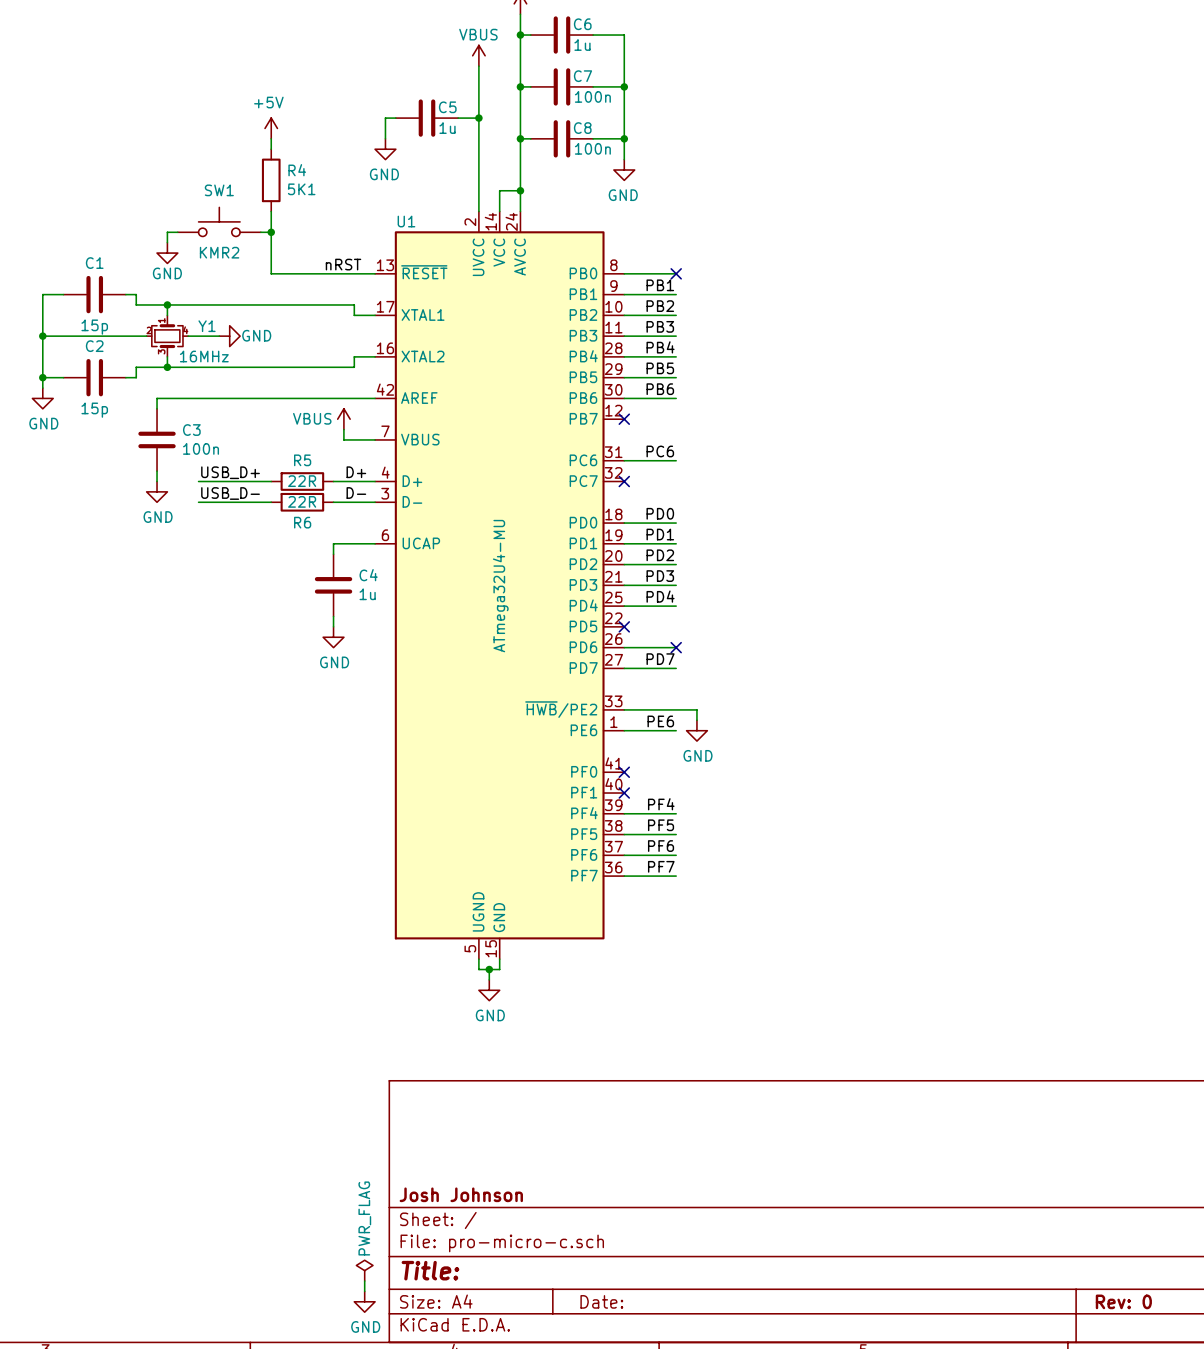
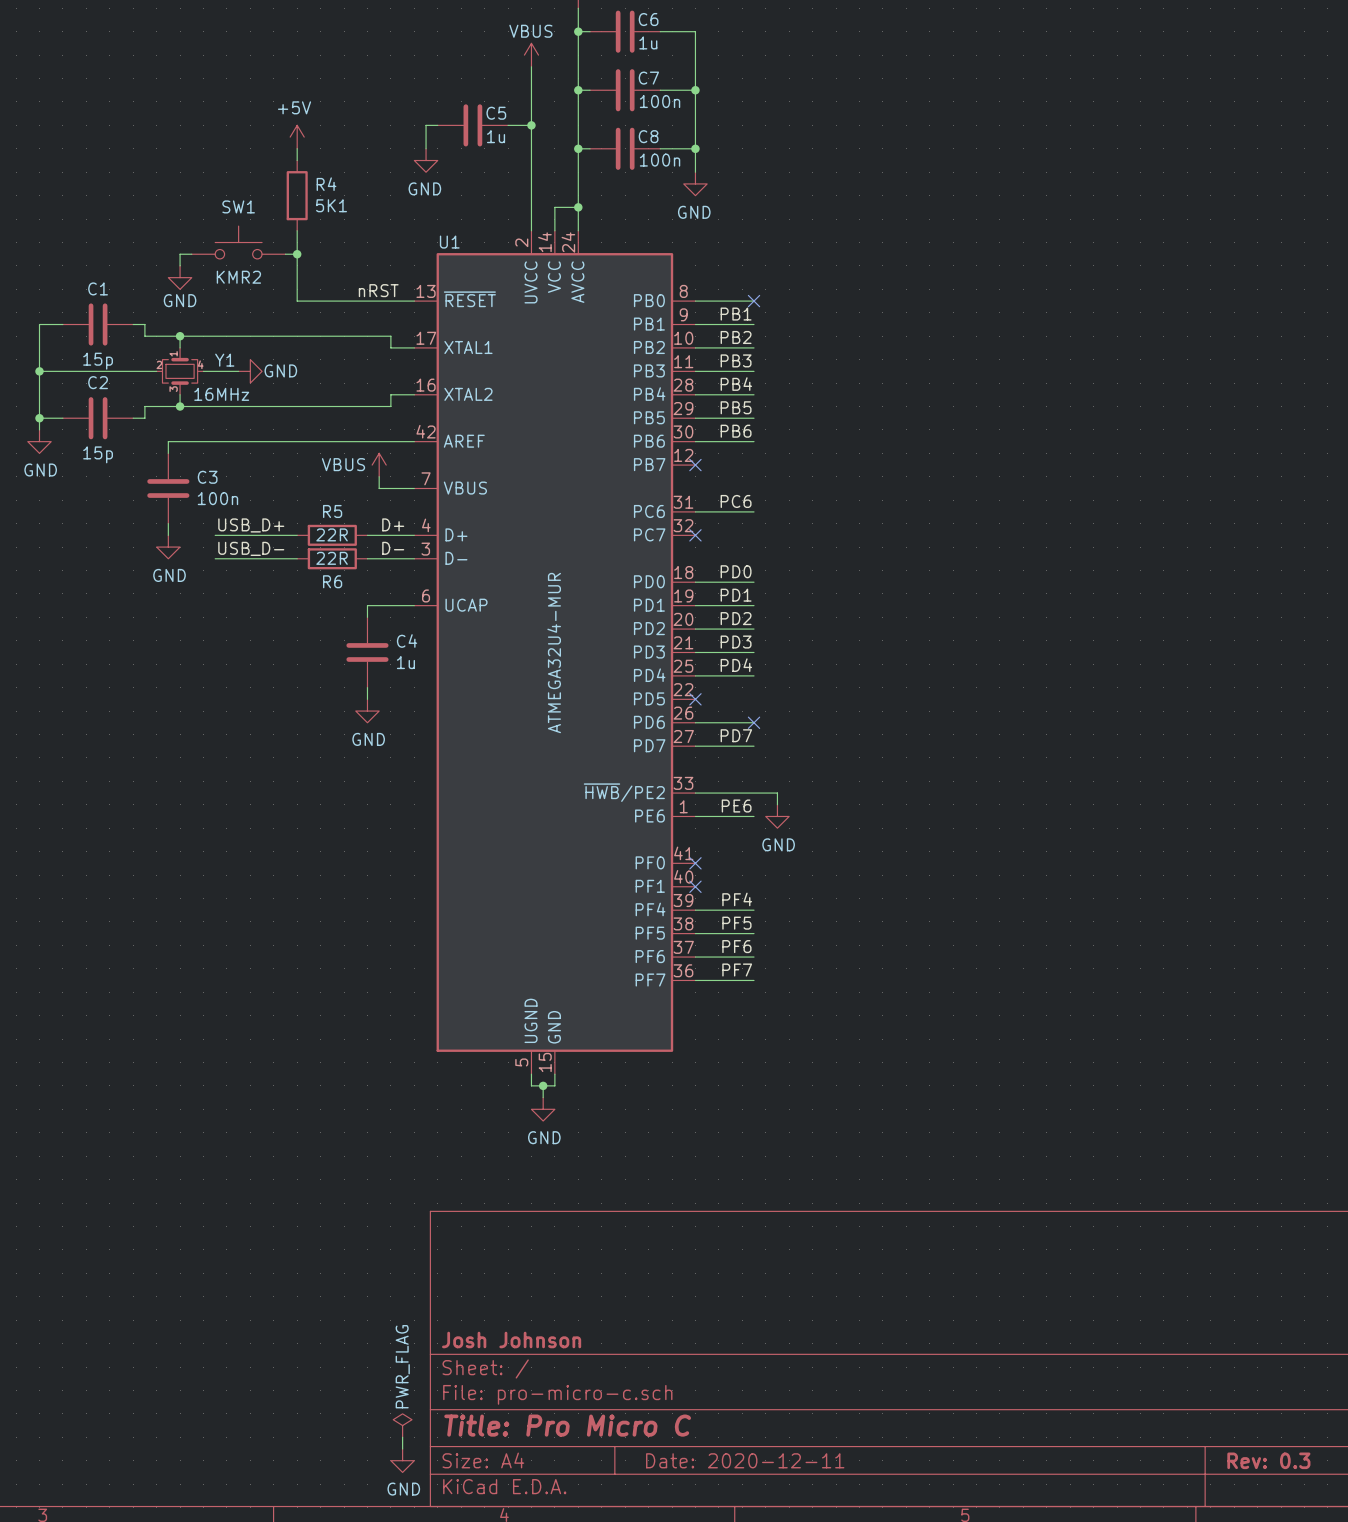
U1 value: ATmega32U4-MU (500, 586) -> ATMEGA32U4-MUR (554, 653)
title block: Title: (430, 1270) -> Title: Pro Micro C (567, 1425)
title block: Date: (601, 1301) -> Date: 2020-12-11 (745, 1460)
title block: Rev: 0 (1123, 1301) -> Rev: 0.3 (1268, 1460)

